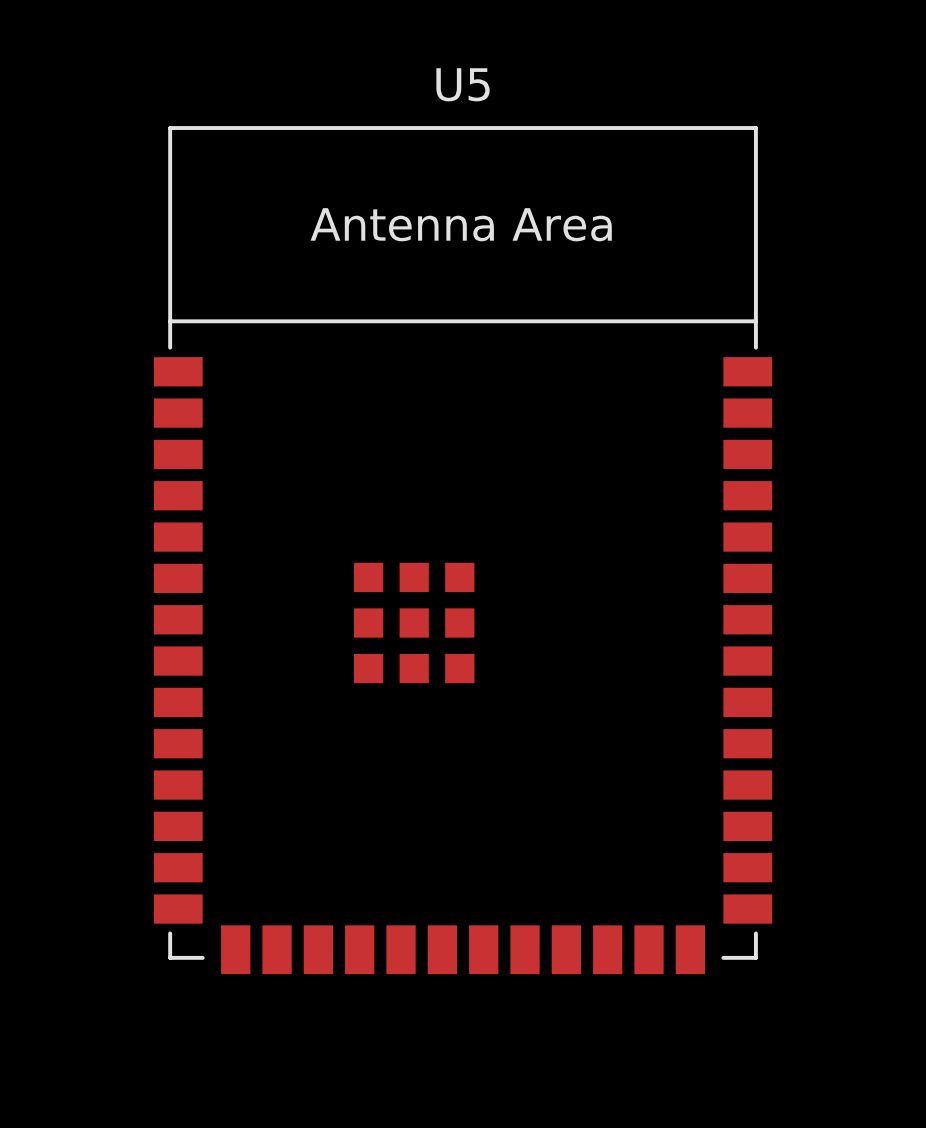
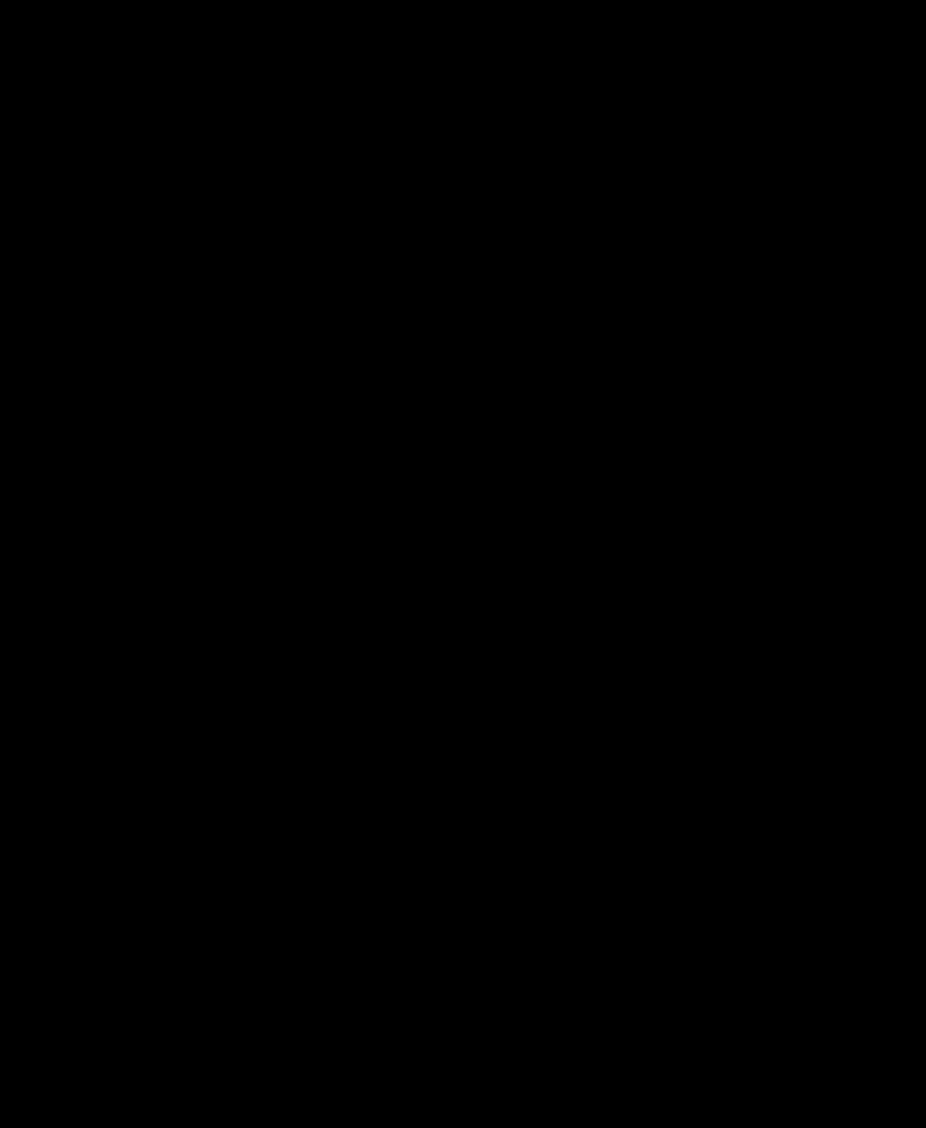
U5: (463, 550) -> none

